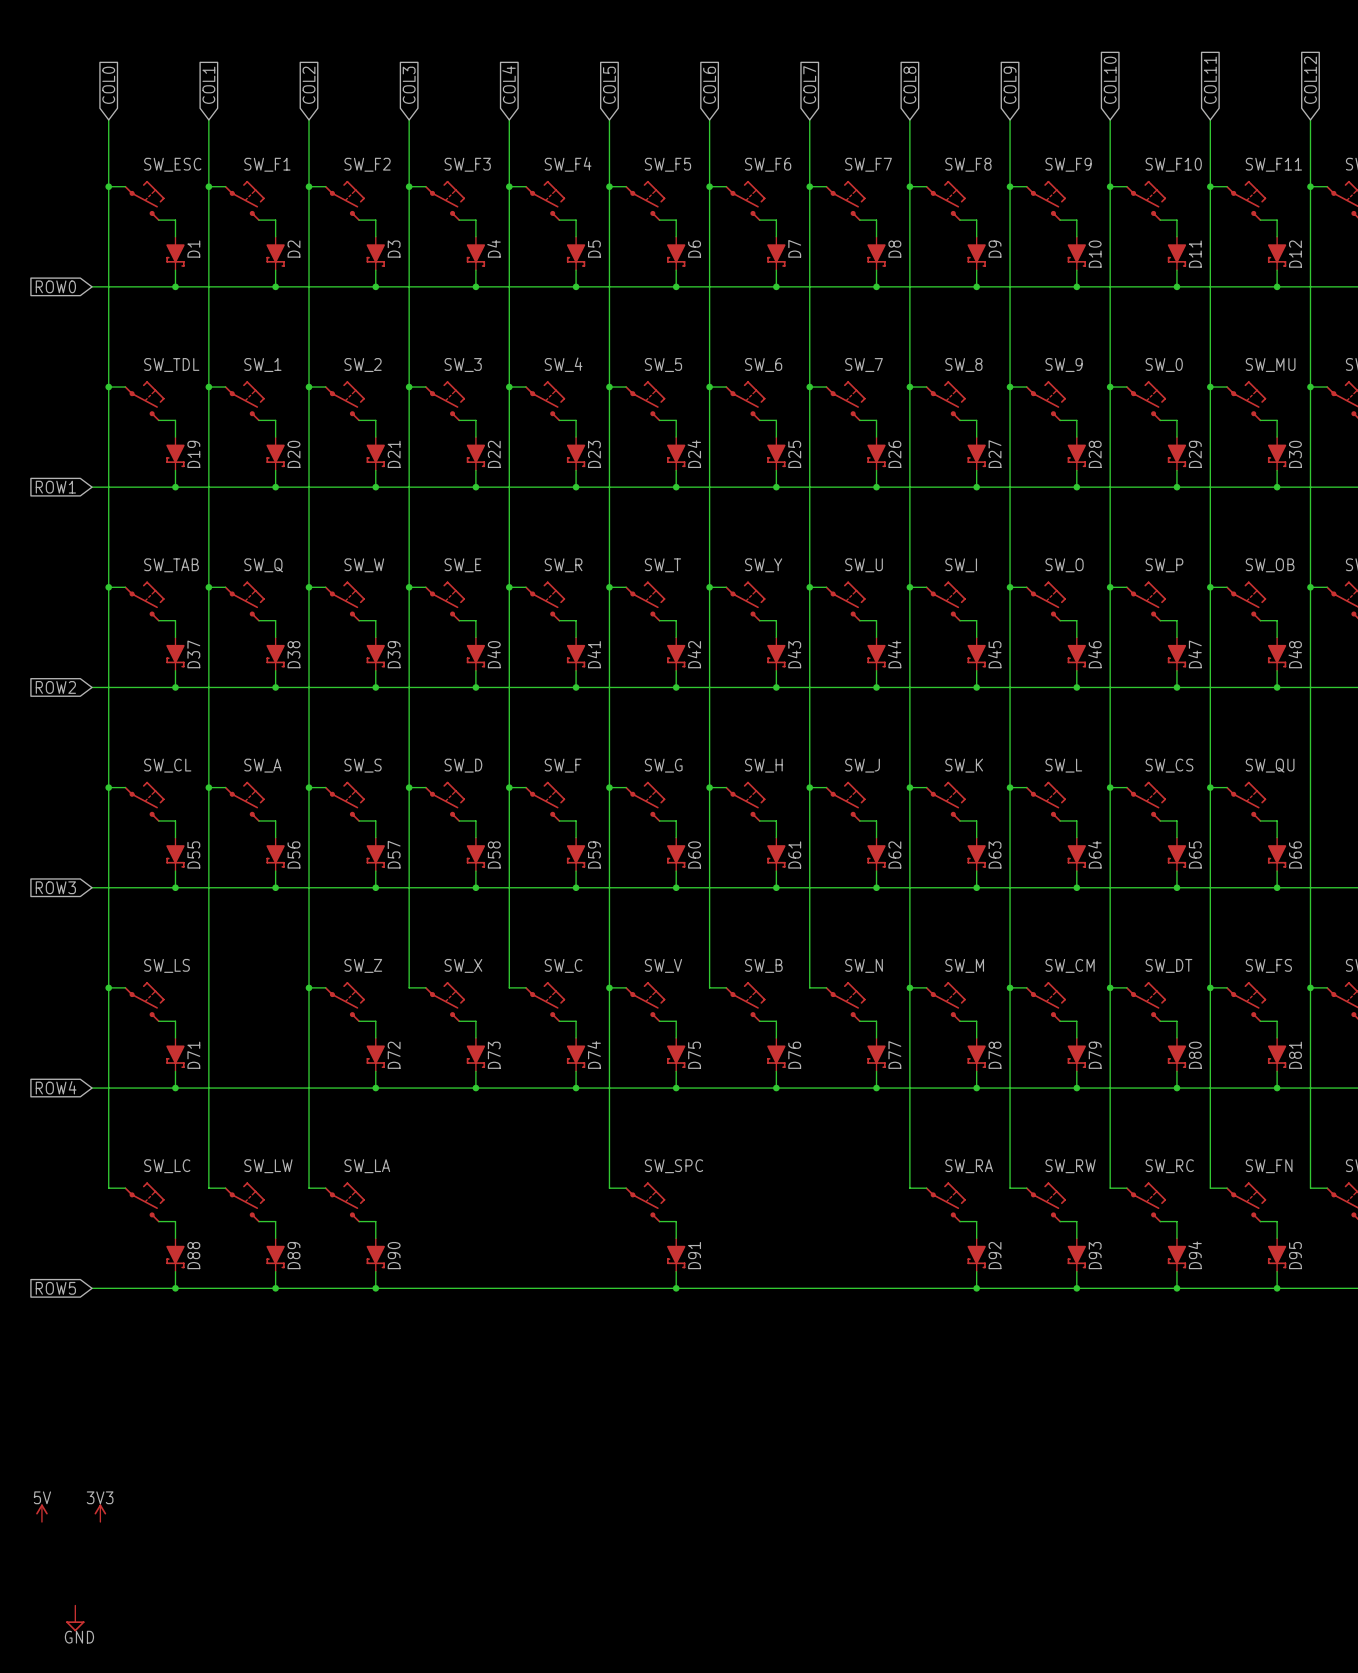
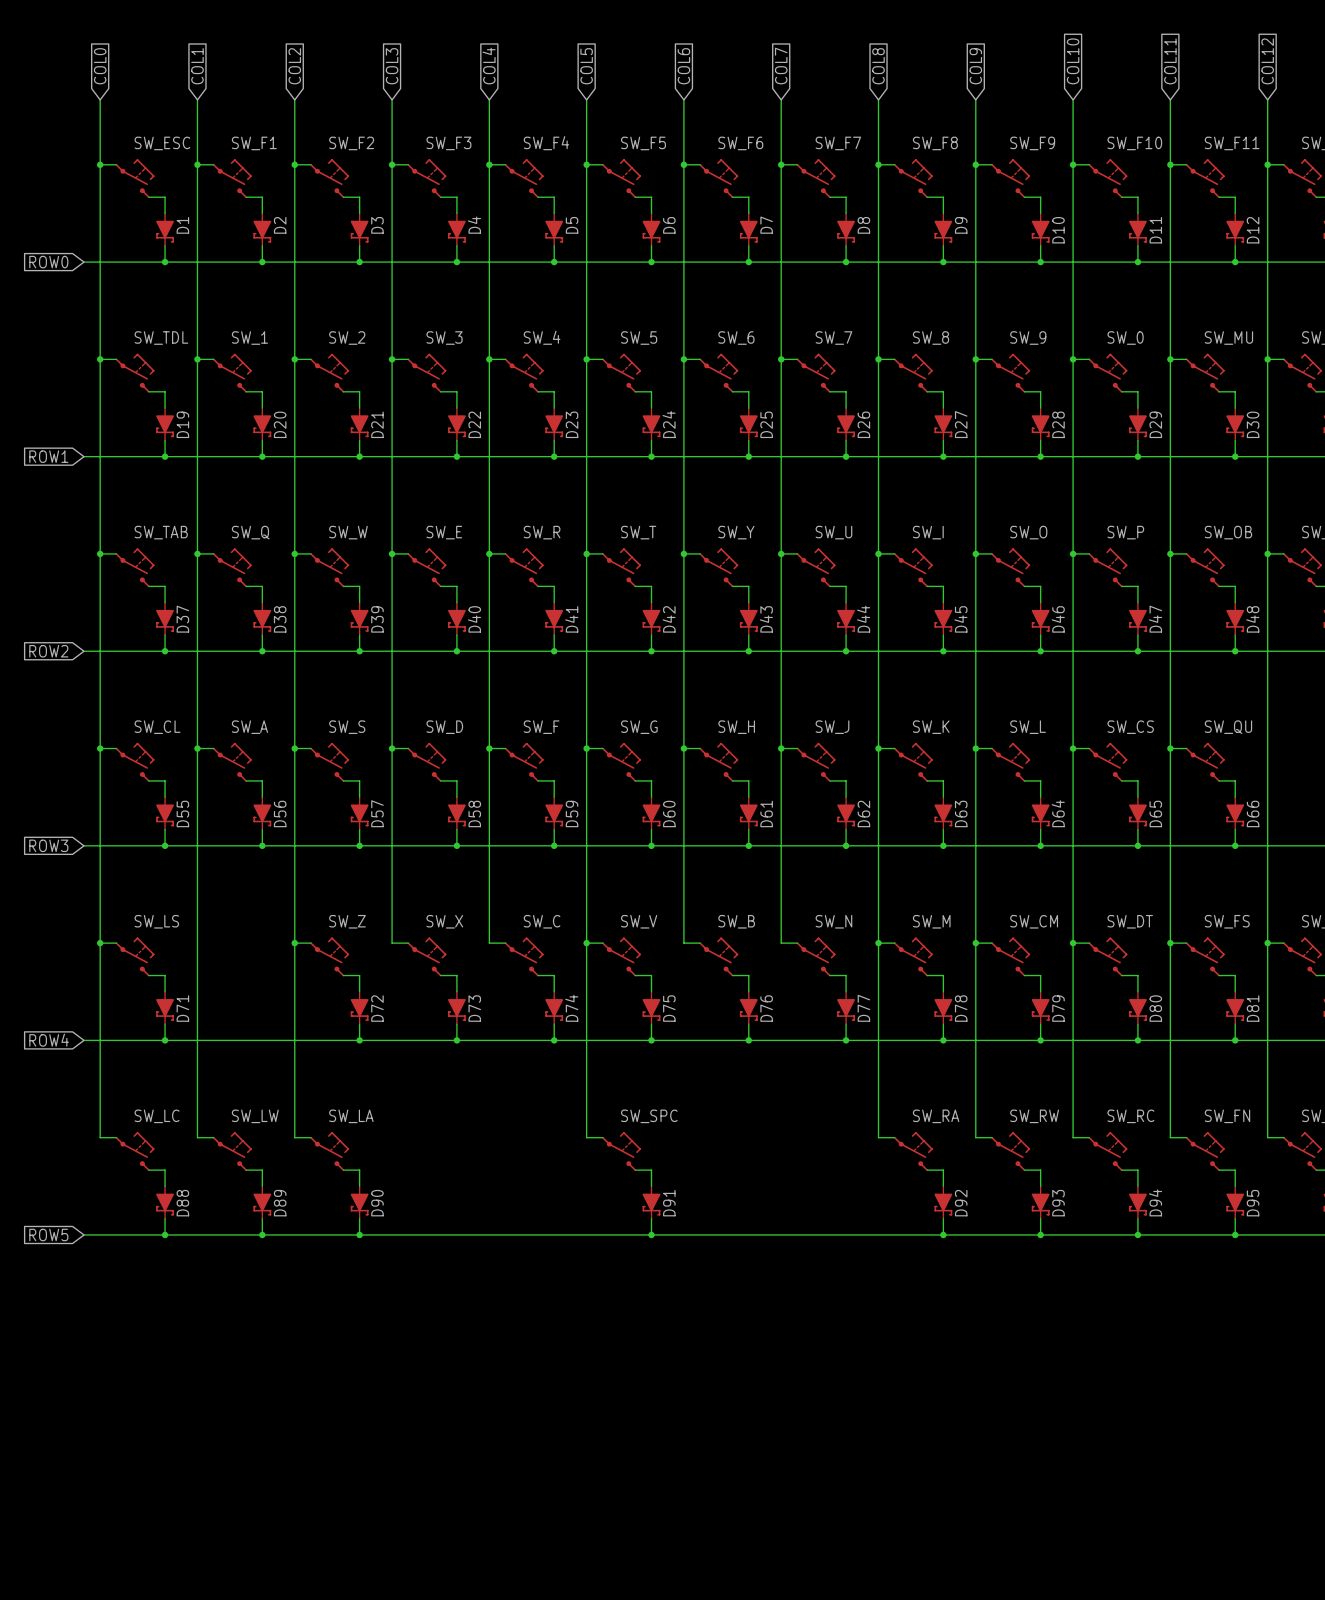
power symbol: 5V (41, 1513) -> none
power symbol: 3V3 (100, 1513) -> none
power symbol: GND (75, 1618) -> none

